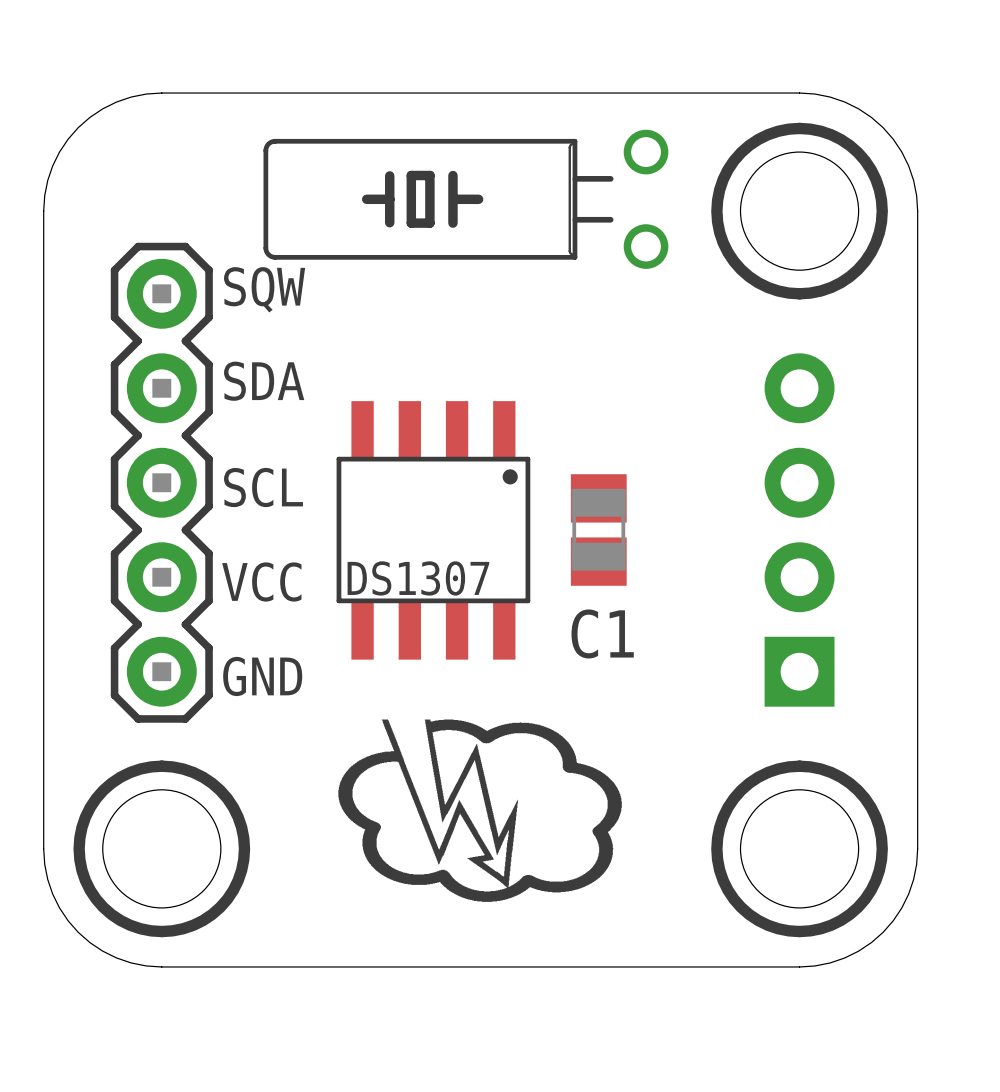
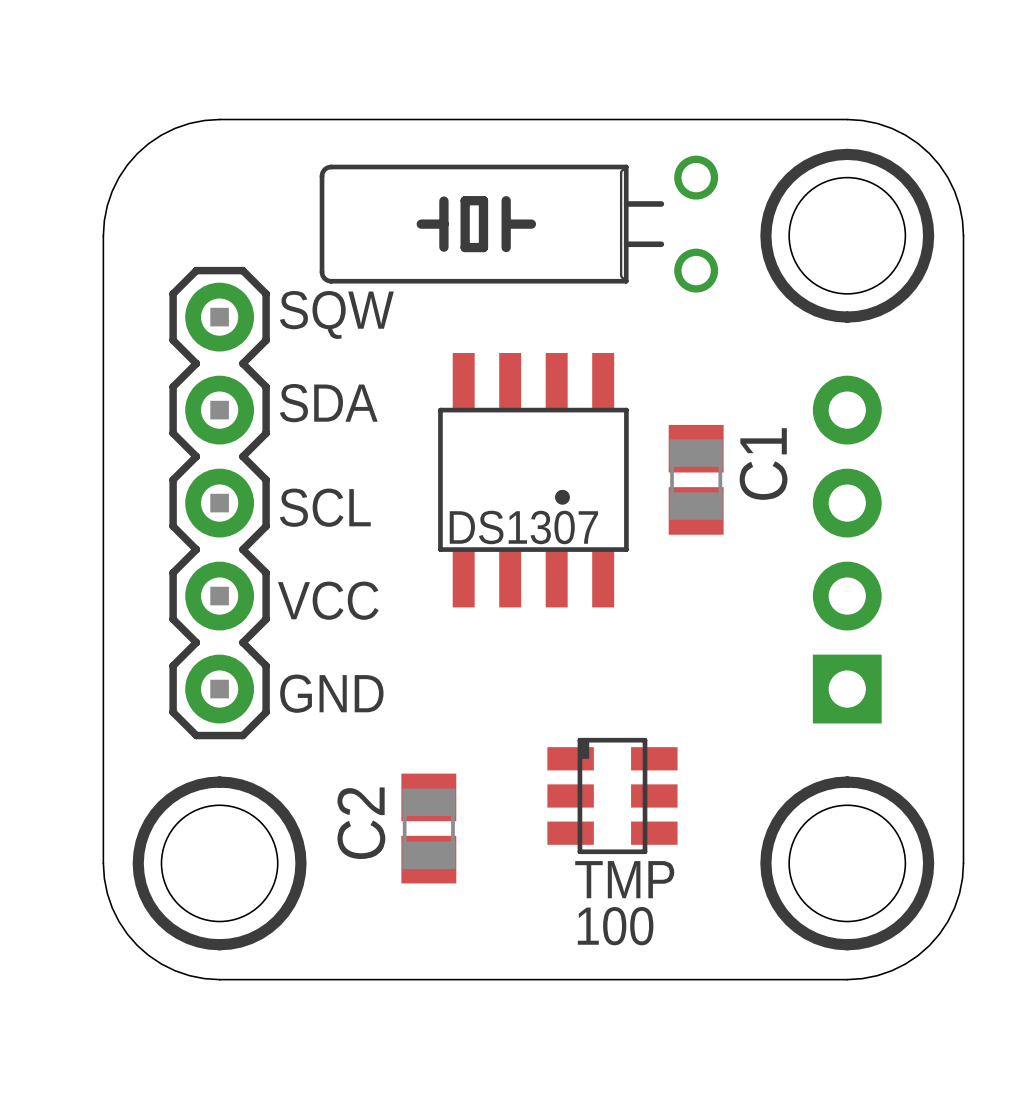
DS1307 position: (433, 530) -> (533, 480)
C1 position: (598, 530) -> (696, 479)
C1 name rotation: 0° (602, 633) -> 90° counterclockwise (763, 464)
C1 name position: C1 (602, 633) -> C1 (763, 464)
drawing: [338, 719, 622, 902] -> none
part: none -> (612, 795)
C2: none -> (428, 828)
text: none -> TMP (624, 879)
text: none -> 100 (615, 926)

